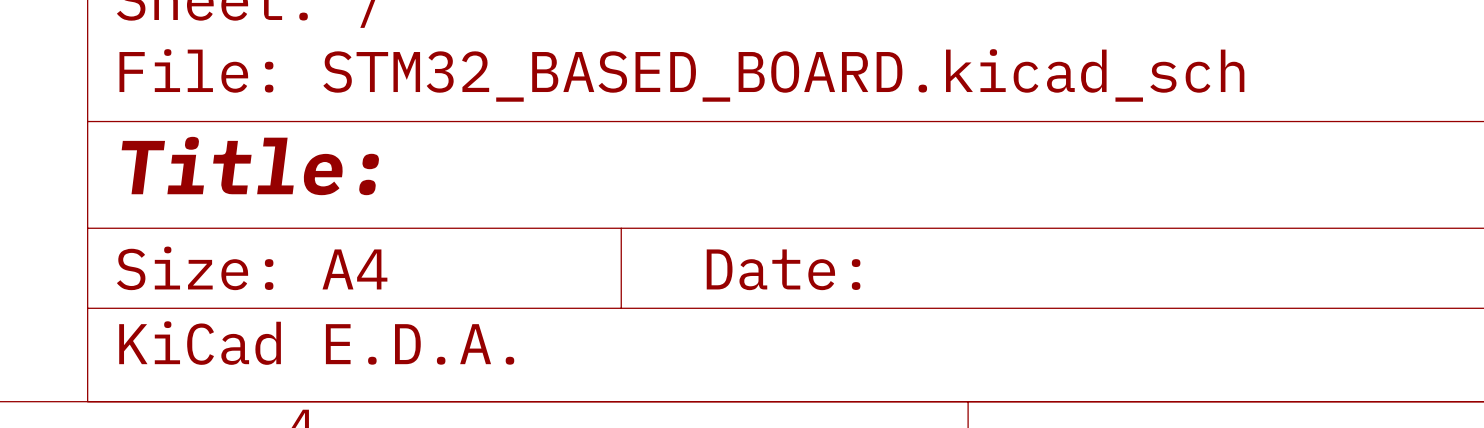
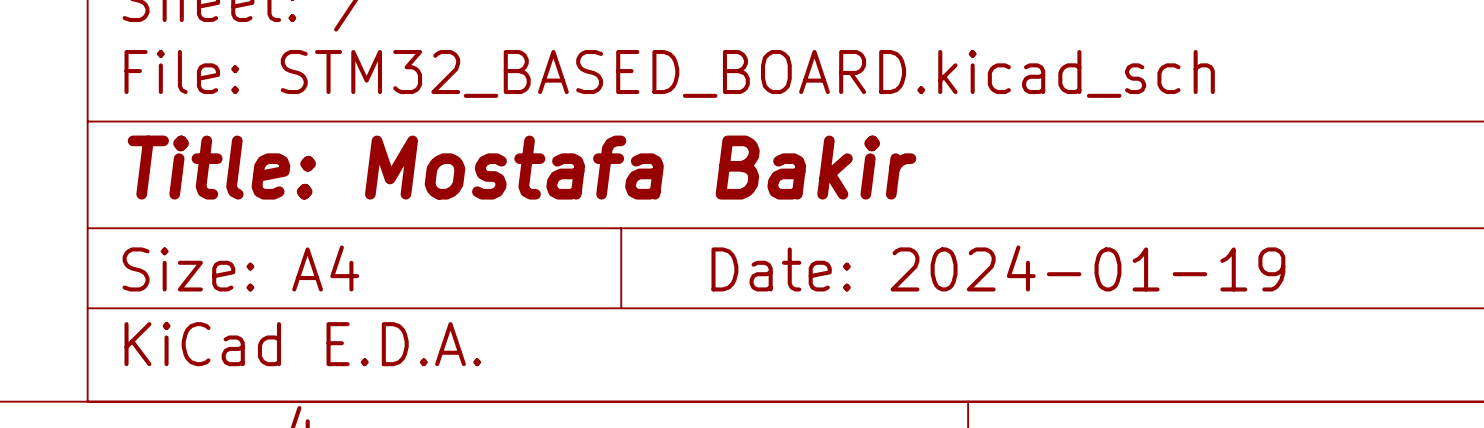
title block: Title: (250, 166) -> Title: Mostafa Bakir (522, 167)
title block: Date: (783, 269) -> Date: 2024-01-19 (998, 268)

